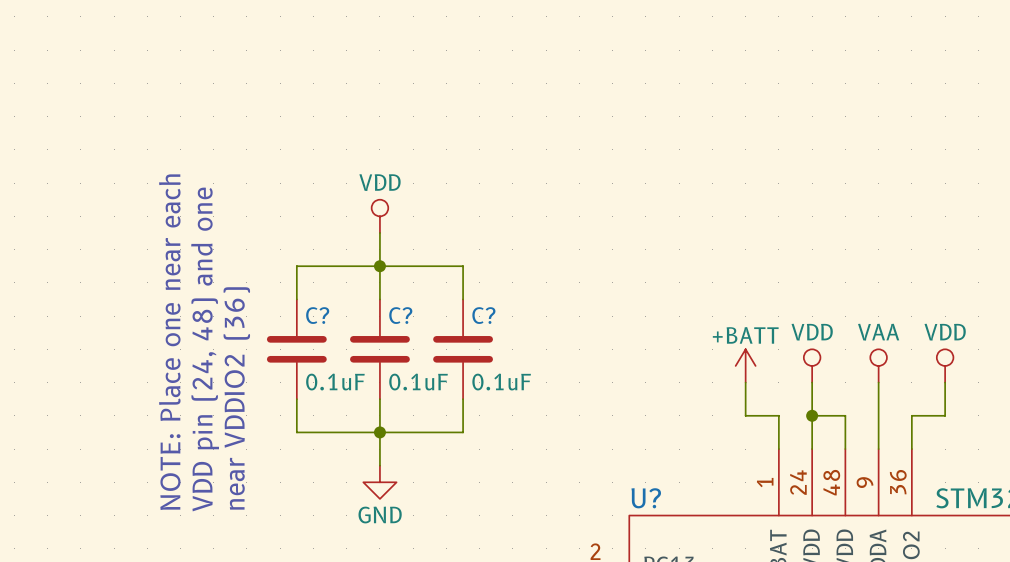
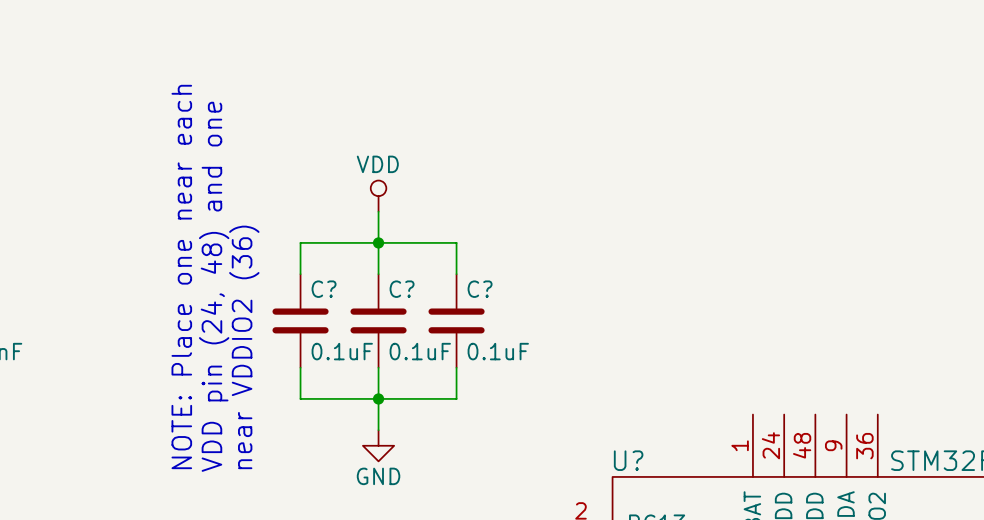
power symbol: +BATT (745, 365) -> none
power symbol: VDD (812, 365) -> none
power symbol: VAA (878, 365) -> none
power symbol: VDD (945, 365) -> none
wire: (745, 382) (745, 415) (778, 415) (778, 449) -> none
wire: (812, 382) (812, 449) -> none
wire: (878, 382) (878, 449) -> none
wire: (945, 382) (945, 415) (911, 415) (911, 449) -> none
wire: (812, 415) (845, 415) (845, 449) -> none
junction: (812, 415) -> none

